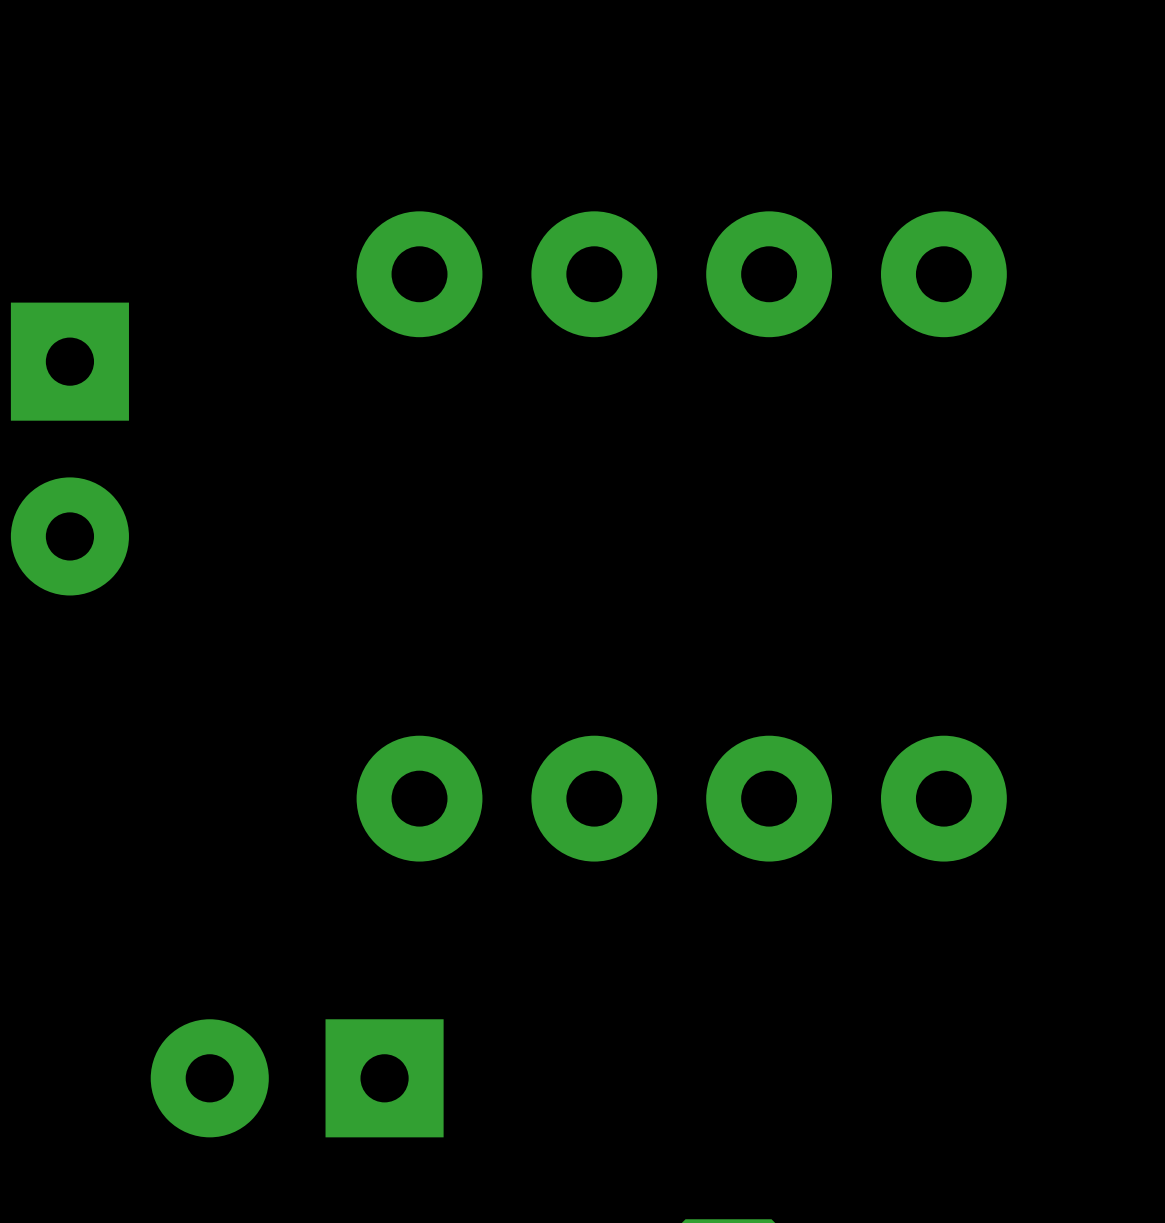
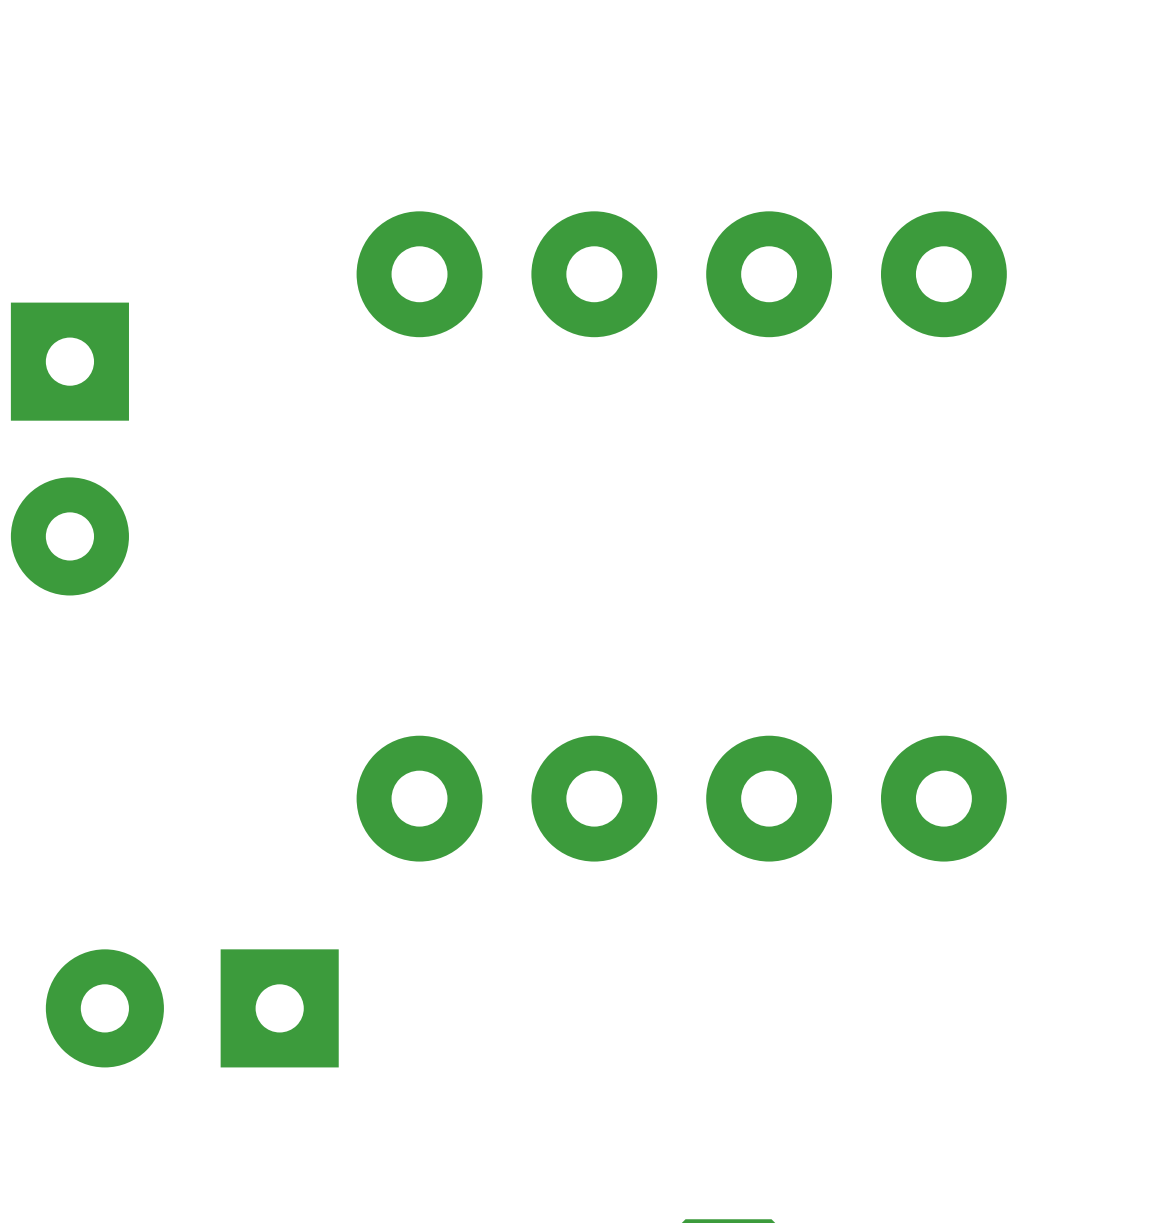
part position: (297, 1078) -> (192, 1008)

